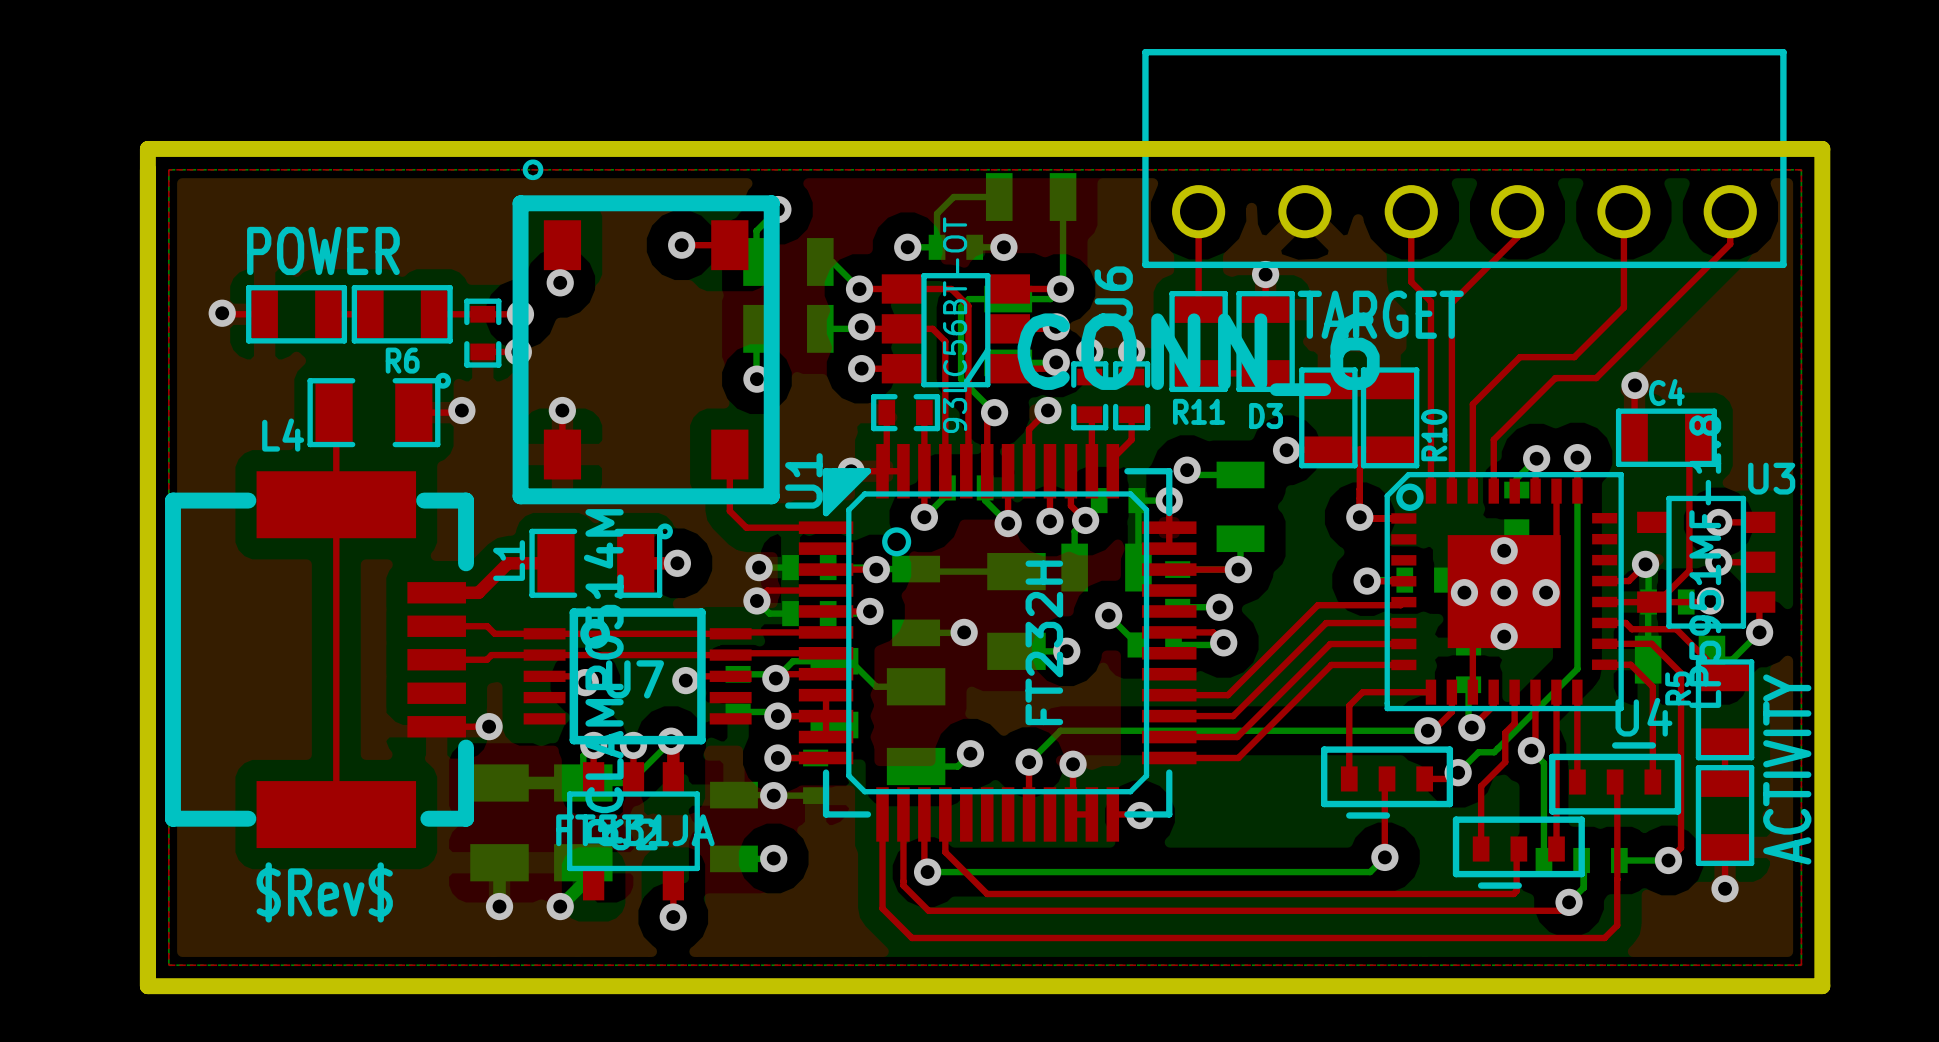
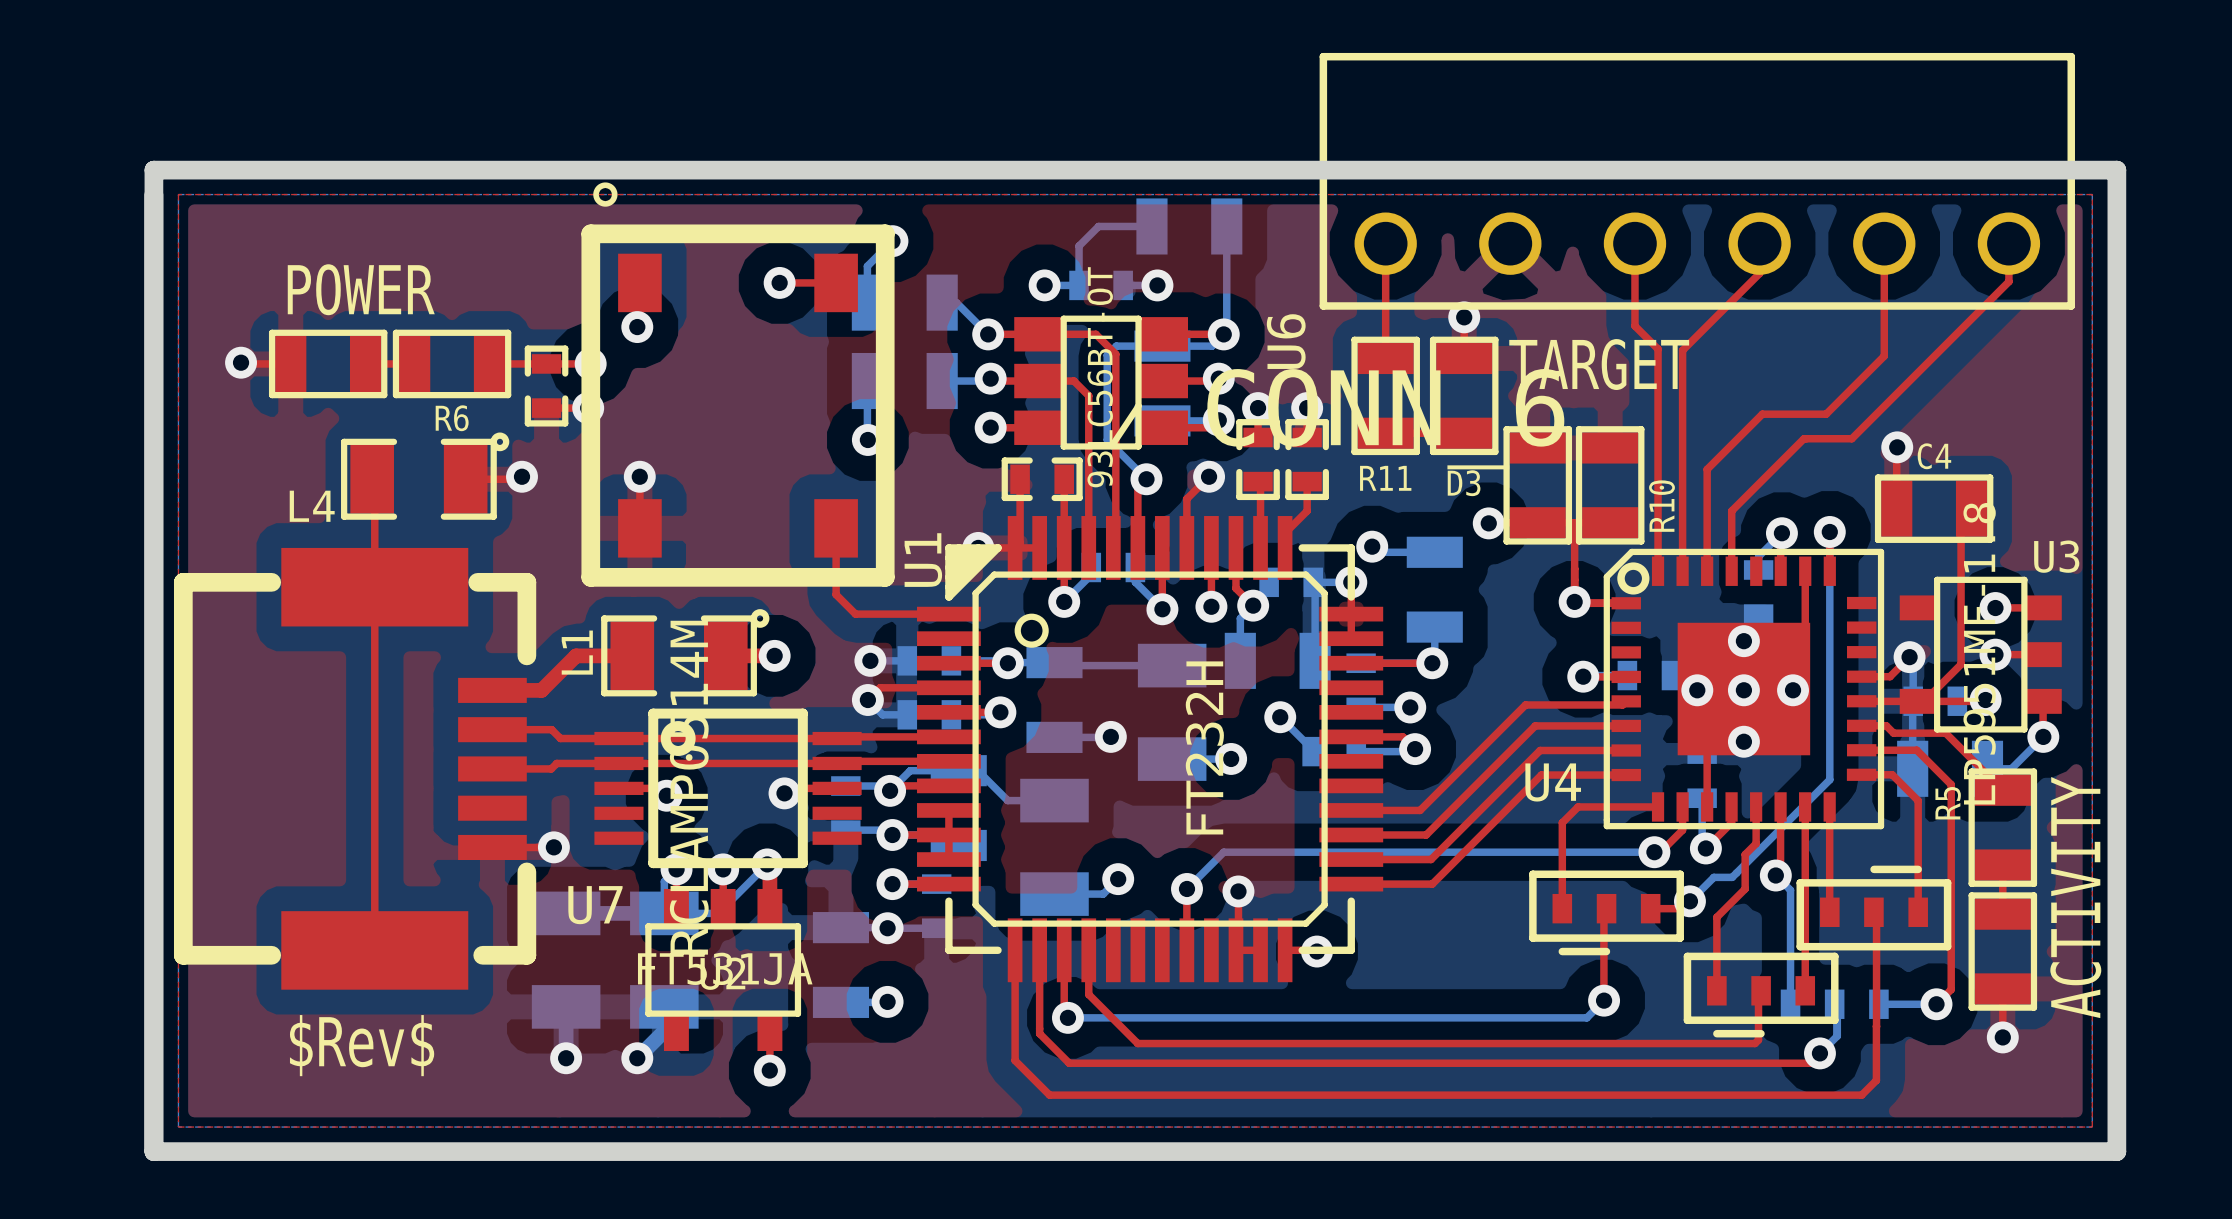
U7 name position: U7 (635, 679) -> U7 (595, 905)
U4 name position: U4 (1643, 717) -> U4 (1553, 782)

